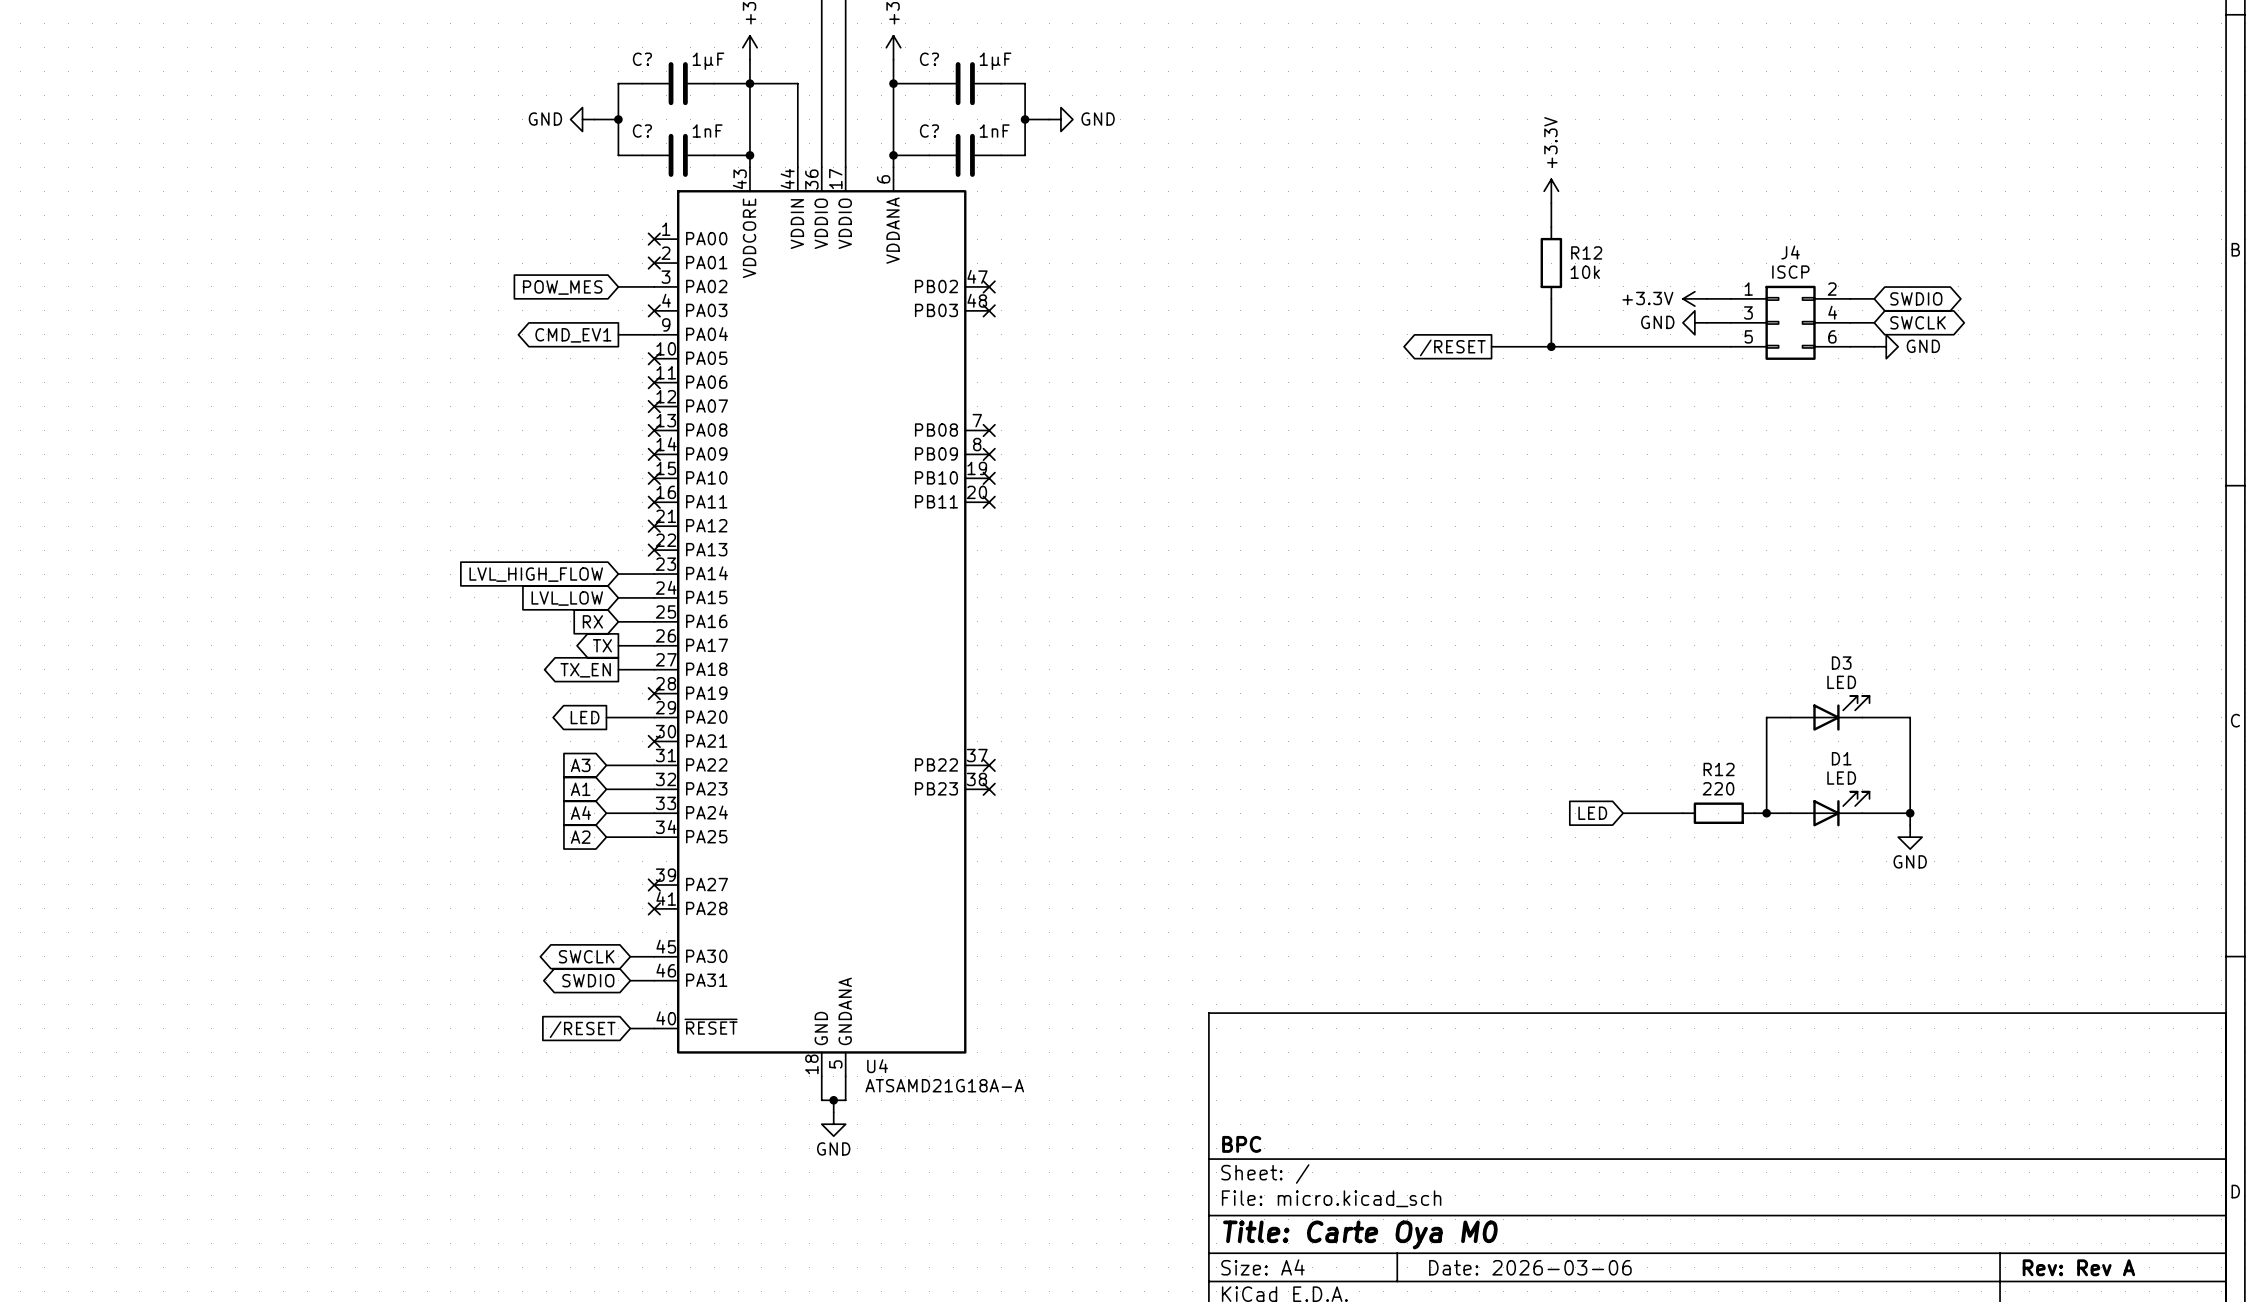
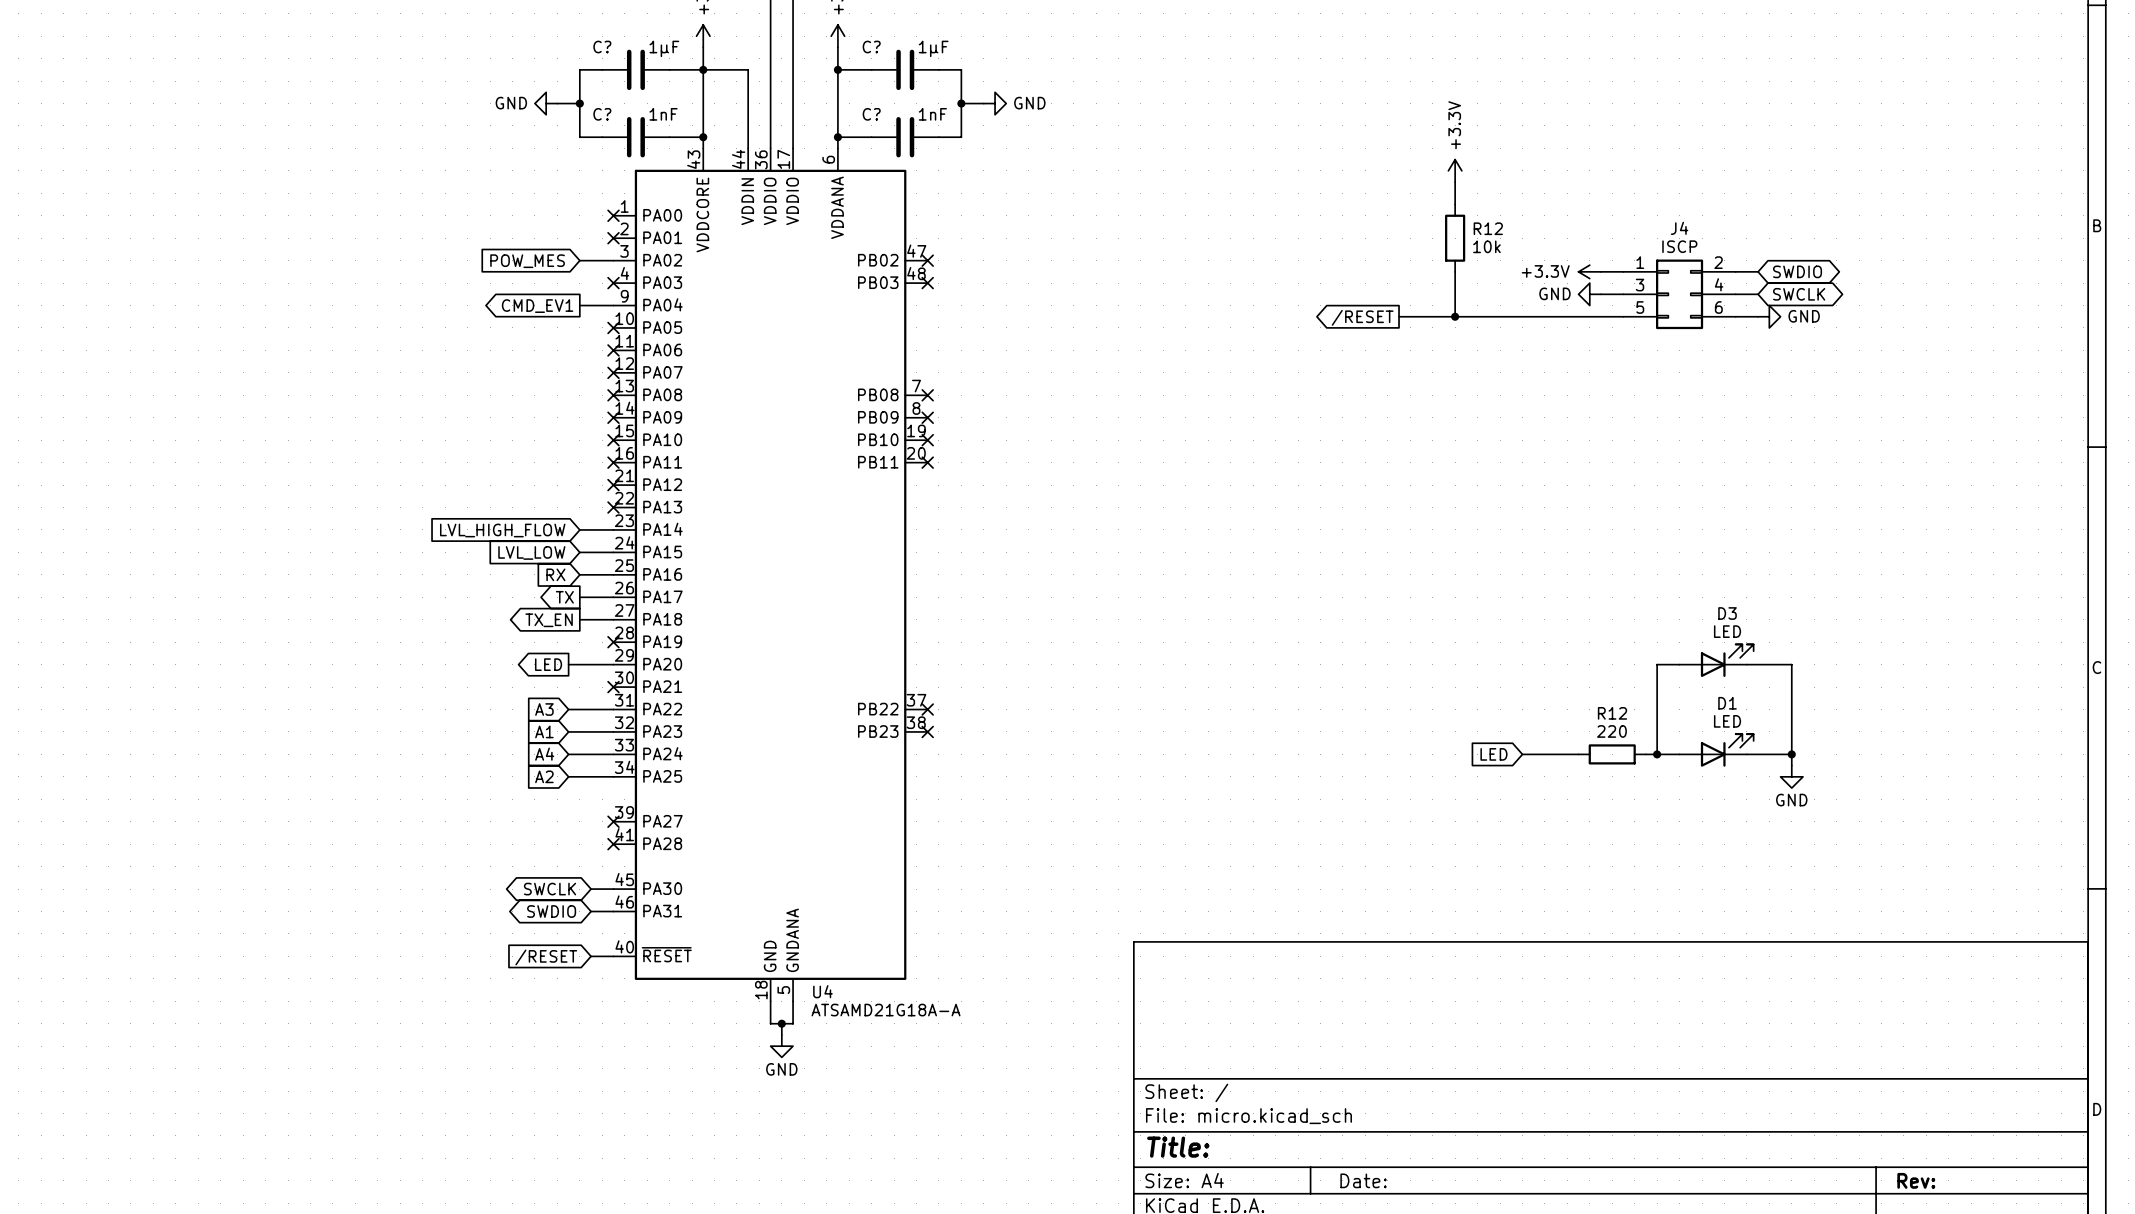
title block: BPC (1241, 1144) -> none
title block: Title: Carte Oya M0 (1360, 1234) -> Title: (1178, 1147)
title block: Date: 2026-03-06 (1530, 1267) -> Date: (1363, 1180)
title block: Rev: Rev A (2078, 1267) -> Rev: (1916, 1180)

